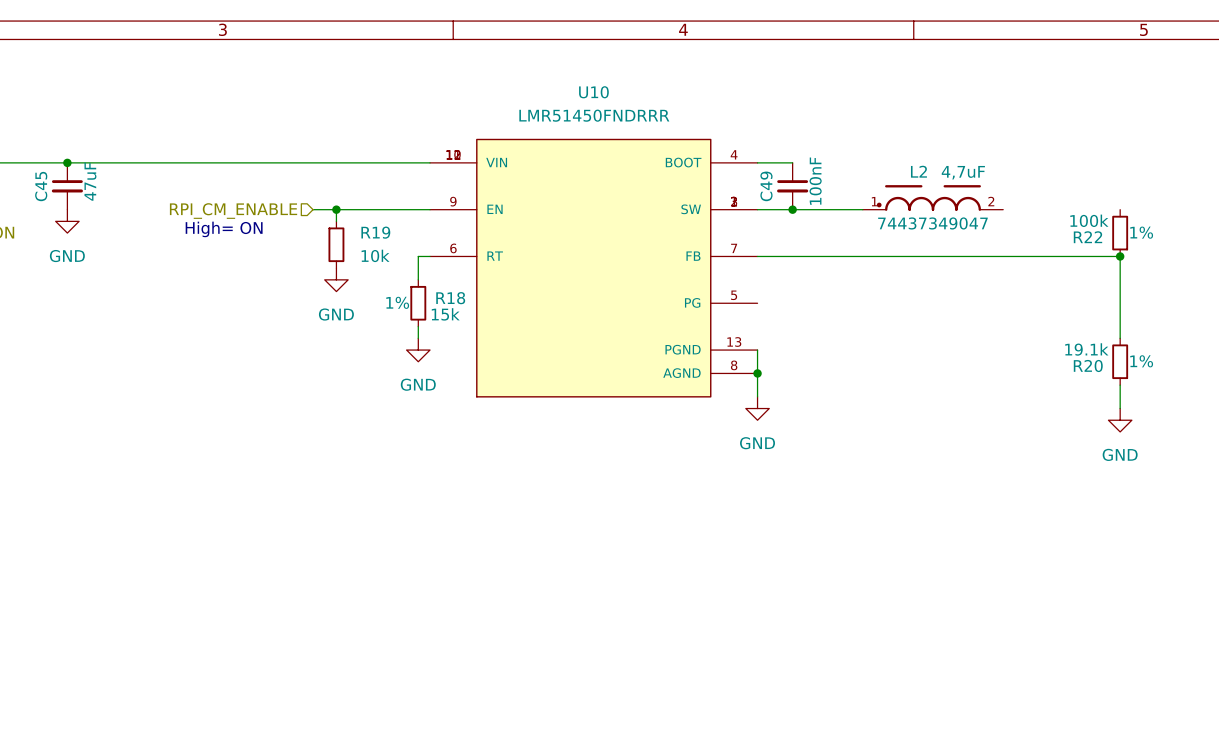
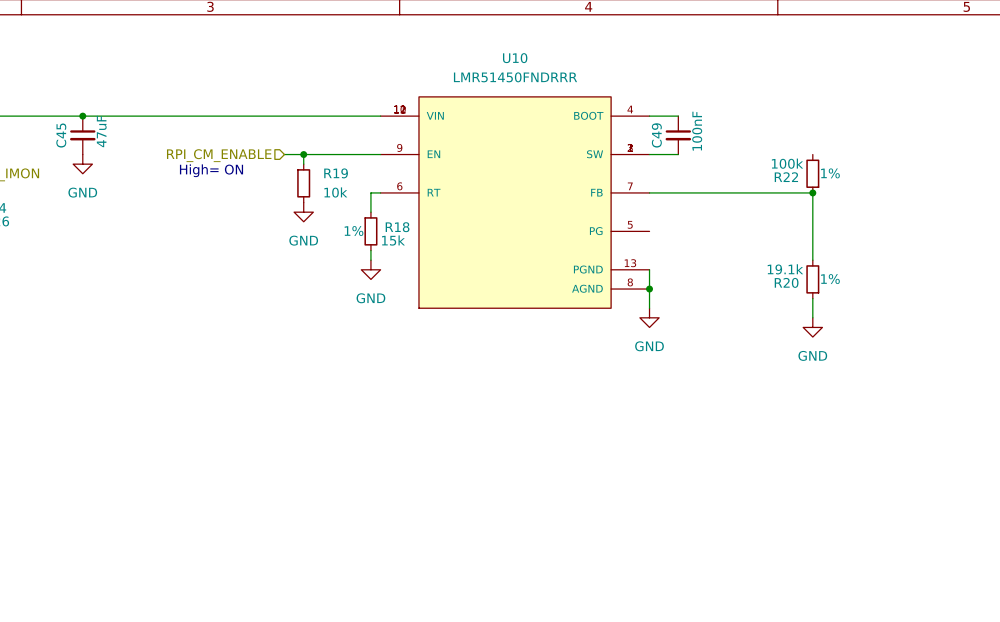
L2: 4,7uF (933, 197) -> none
wire: (792, 209) (862, 209) -> none
junction: (792, 209) -> none
R22 position: (1120, 233) -> (812, 173)
wire: (956, 256) (1120, 256) (1120, 338) -> (812, 192) (812, 260)
junction: none -> (812, 192)
junction: (1120, 256) -> none
R20 position: (1120, 361) -> (812, 279)
wire: (1120, 385) (1120, 408) -> (812, 298) (812, 317)
power symbol position: GND (1120, 420) -> GND (812, 327)

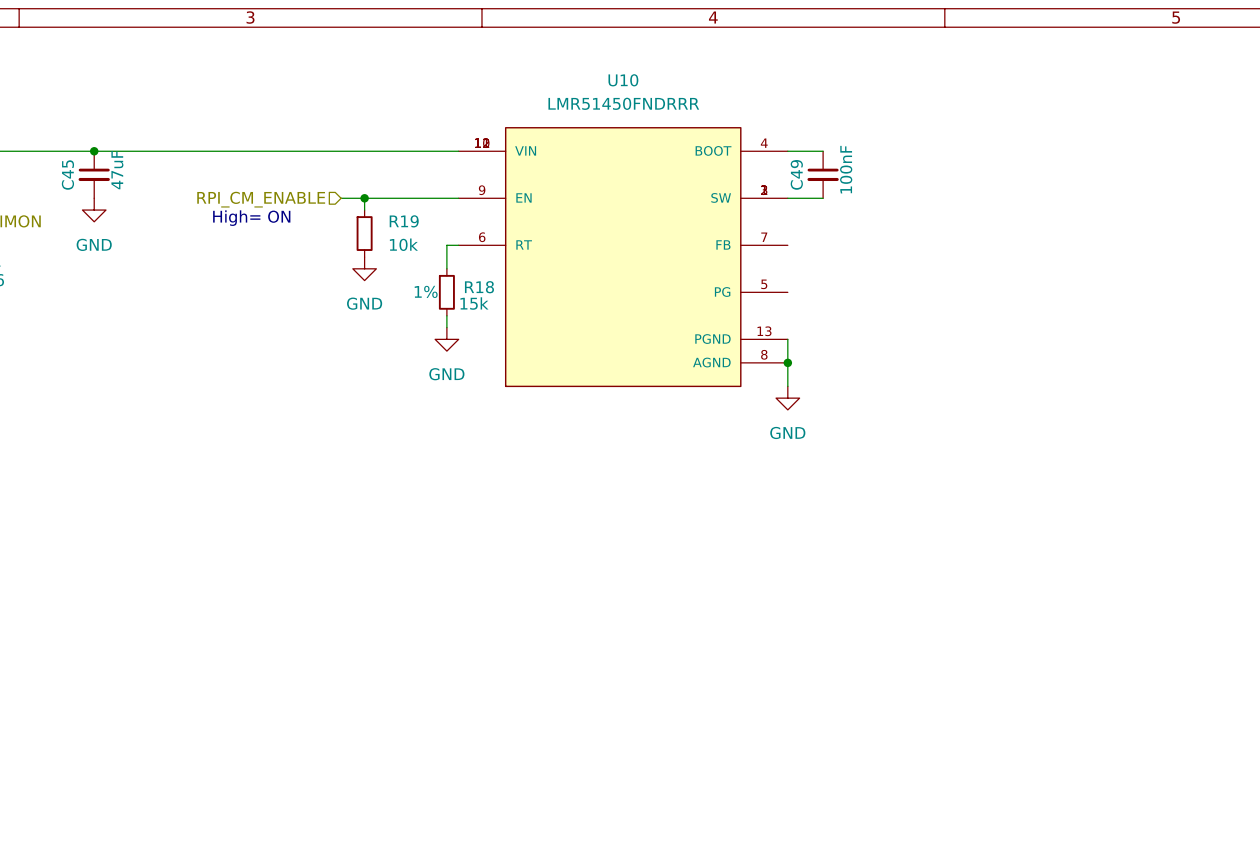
R22: 100k (812, 173) -> none
wire: (649, 192) (812, 192) (812, 260) -> none
junction: (812, 192) -> none
R20: 19.1k (812, 279) -> none
wire: (812, 298) (812, 317) -> none
power symbol: GND (812, 327) -> none

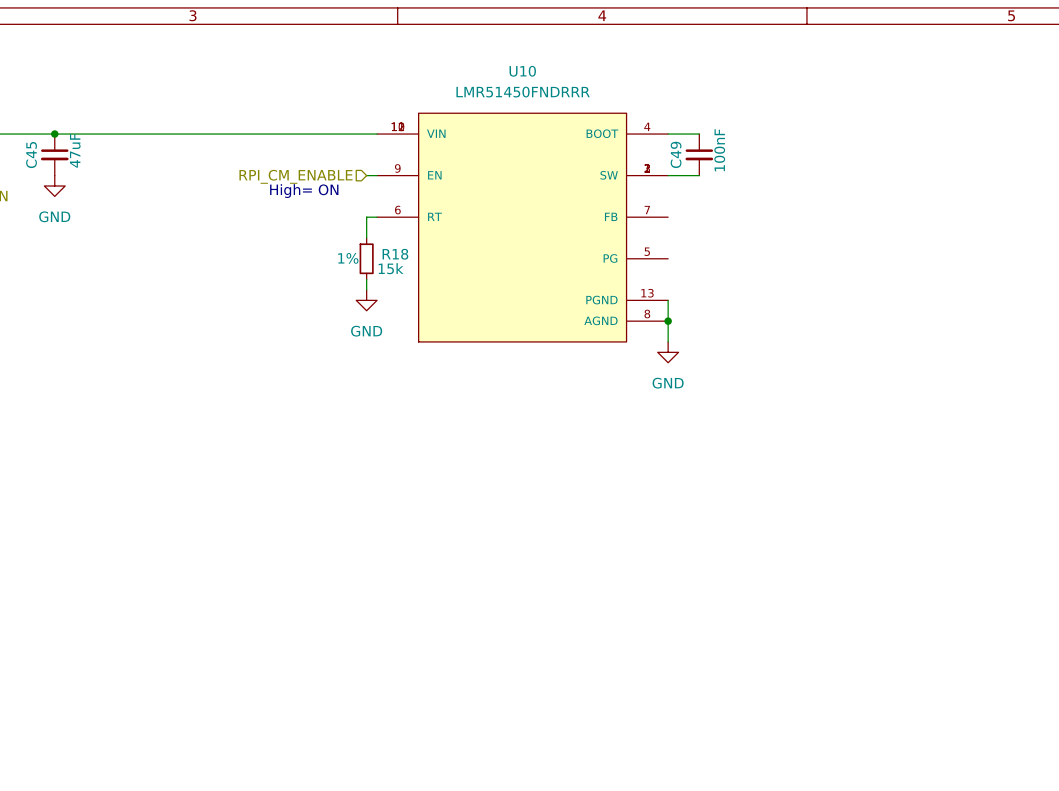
wire: (341, 198) (446, 198) -> none
wire: (364, 198) (364, 210) -> none
junction: (364, 198) -> none
hierarchical label position: RPI_CM_ENABLE (261, 199) -> RPI_CM_ENABLE (295, 176)
text position: High= ON (251, 218) -> High= ON (304, 191)
R19: 10k (364, 233) -> none
power symbol: GND (364, 268) -> none

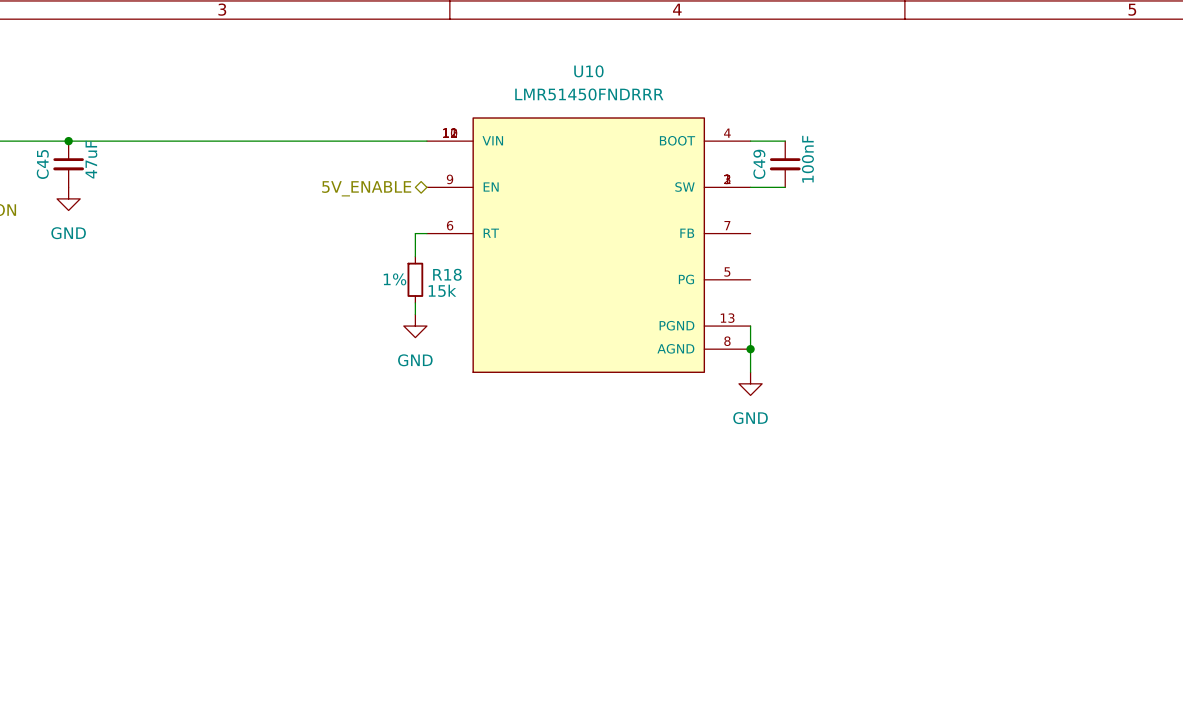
wire: (366, 175) (377, 175) -> none
hierarchical label shape: input (295, 176) -> bidirectional (366, 188)
hierarchical label: RPI_CM_ENABLE (295, 176) -> 5V_ENABLE (366, 188)
text: High= ON (304, 191) -> none

